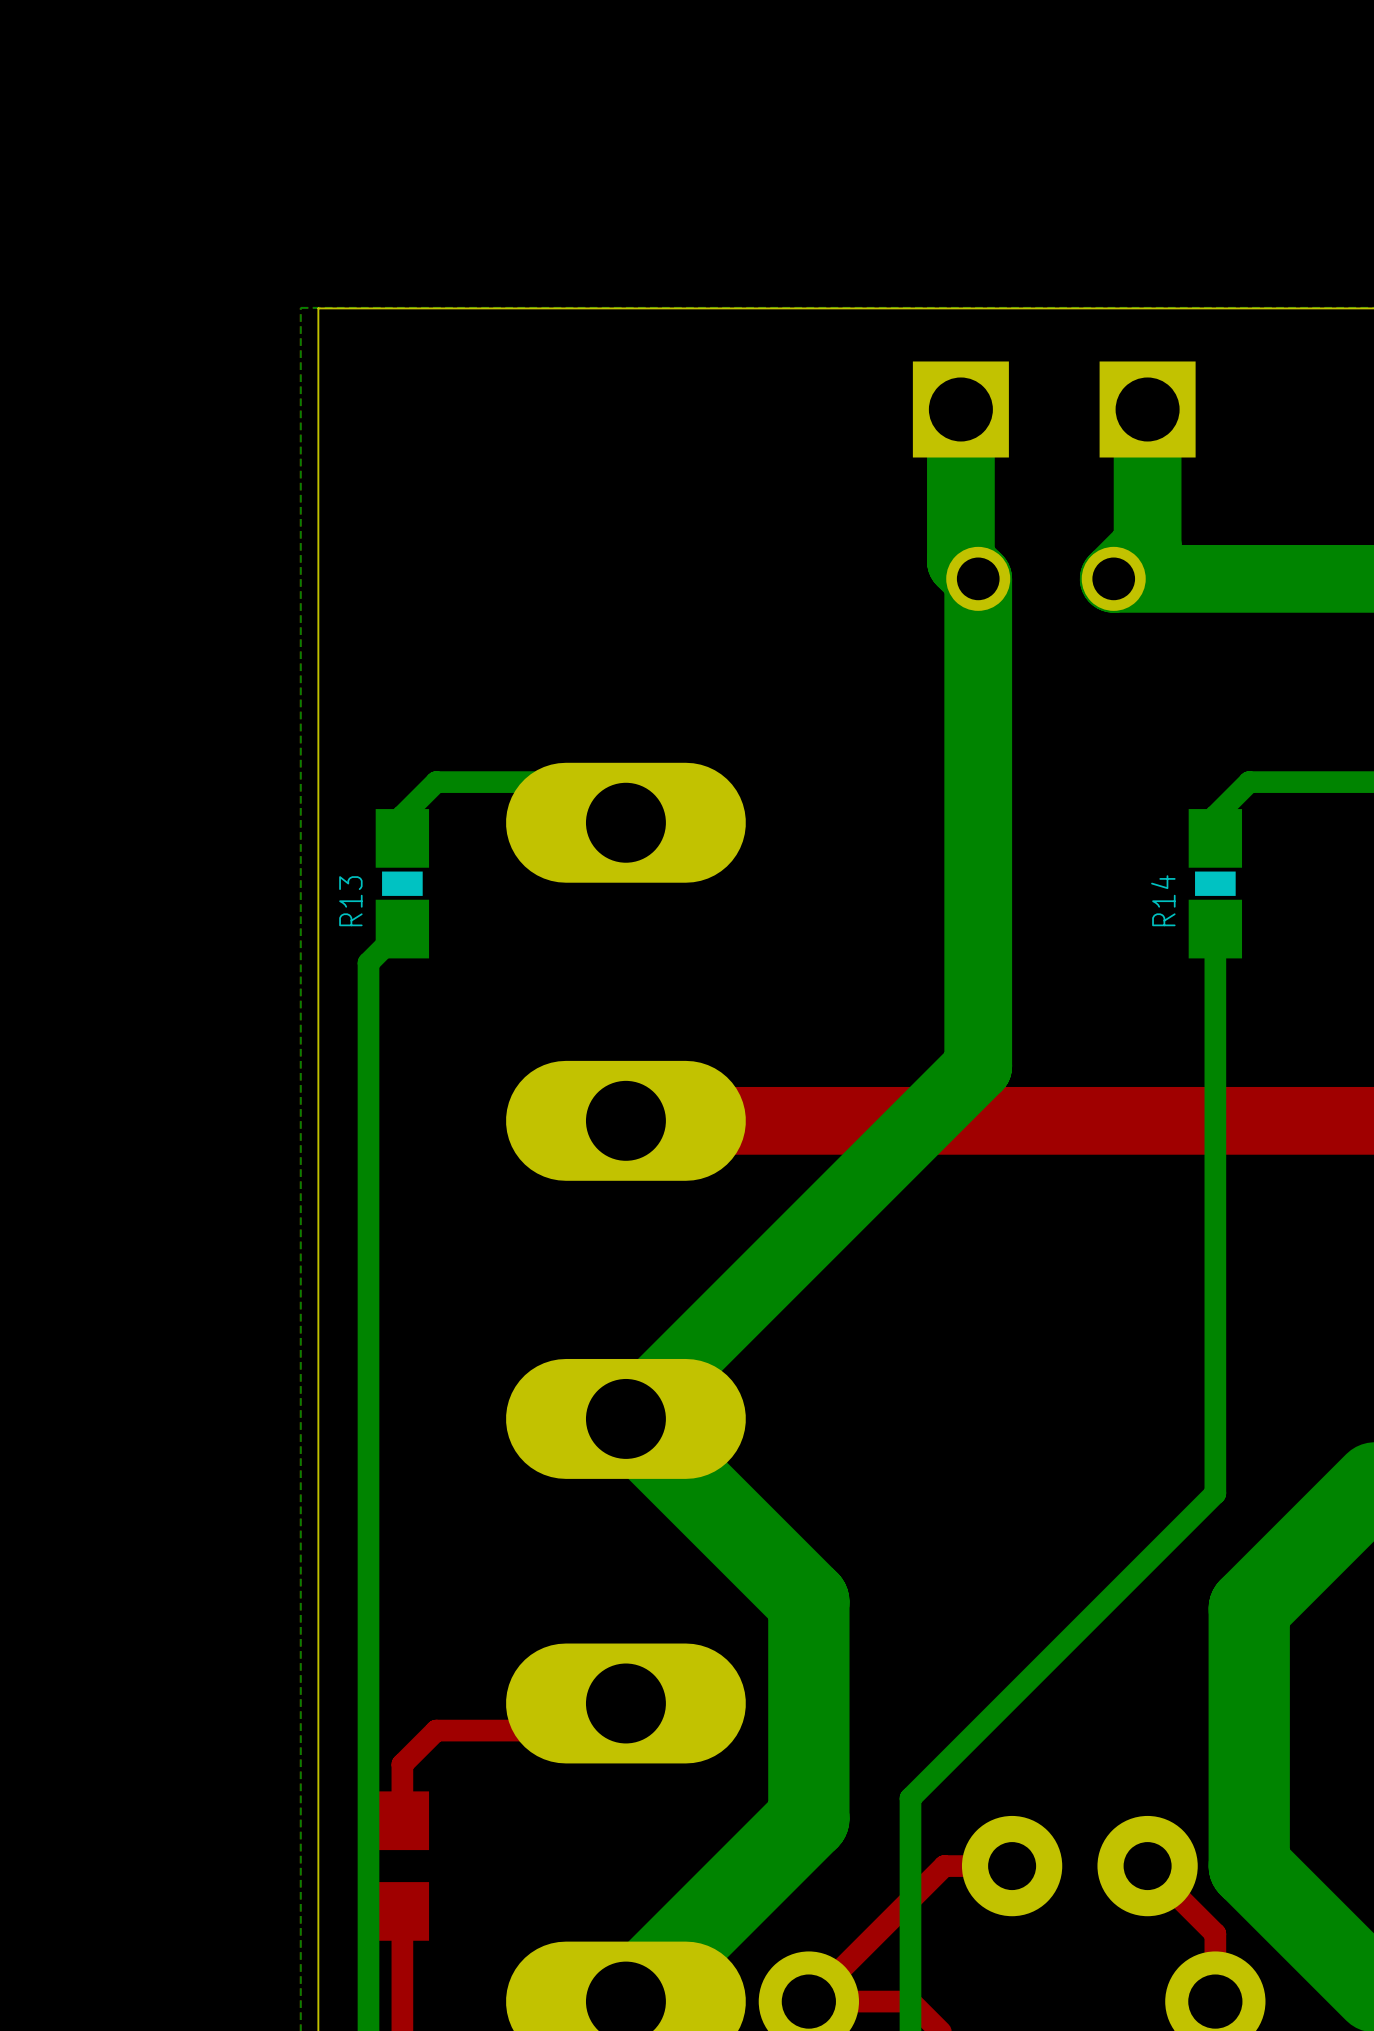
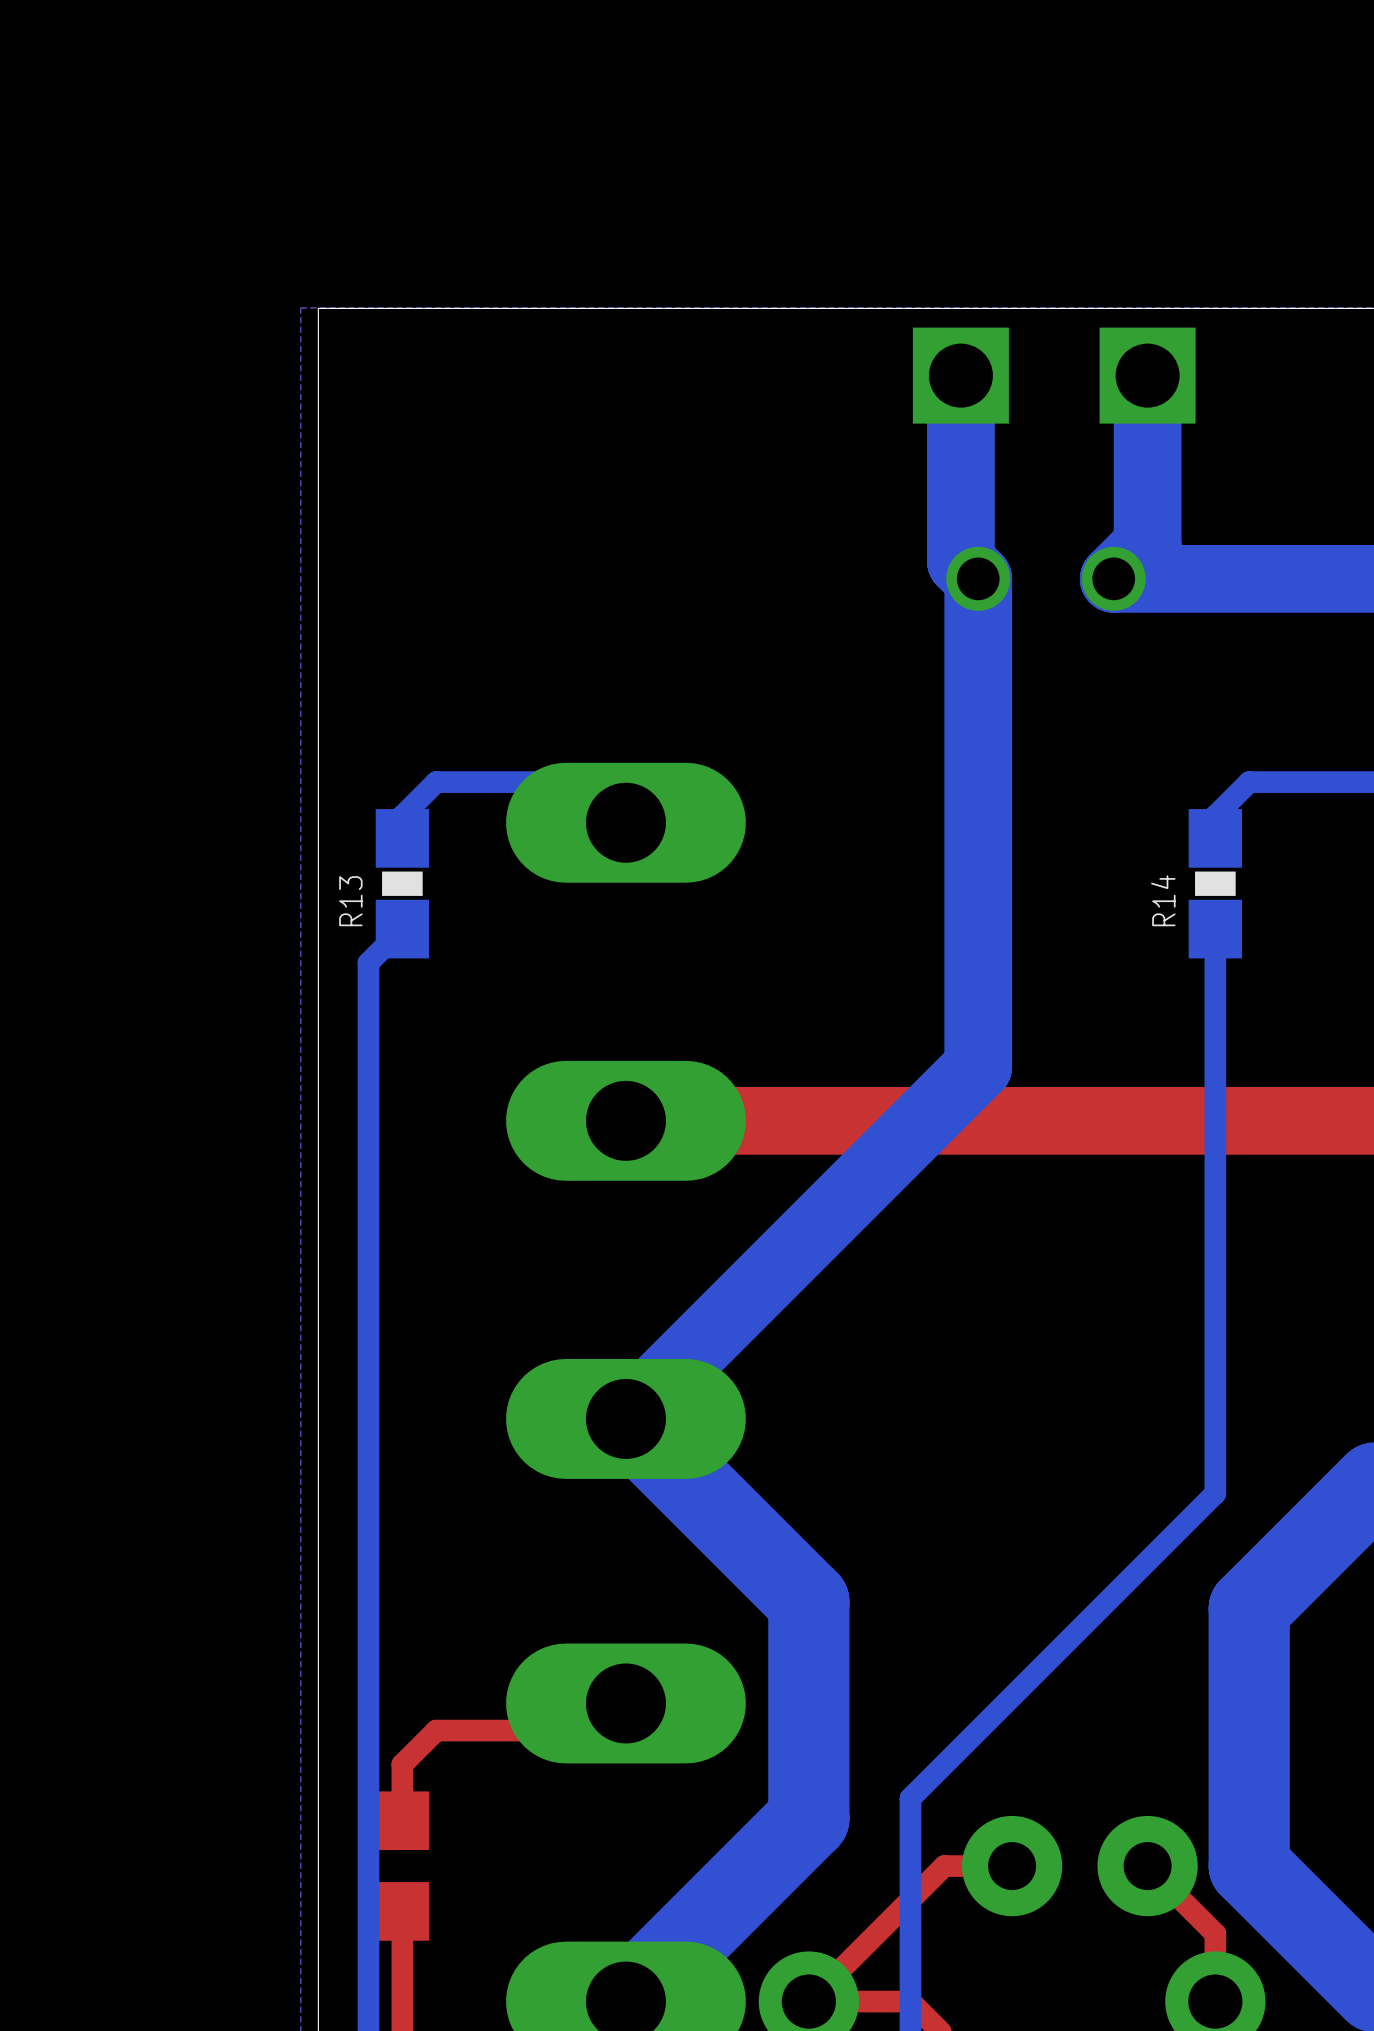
part position: (1054, 409) -> (1054, 375)

